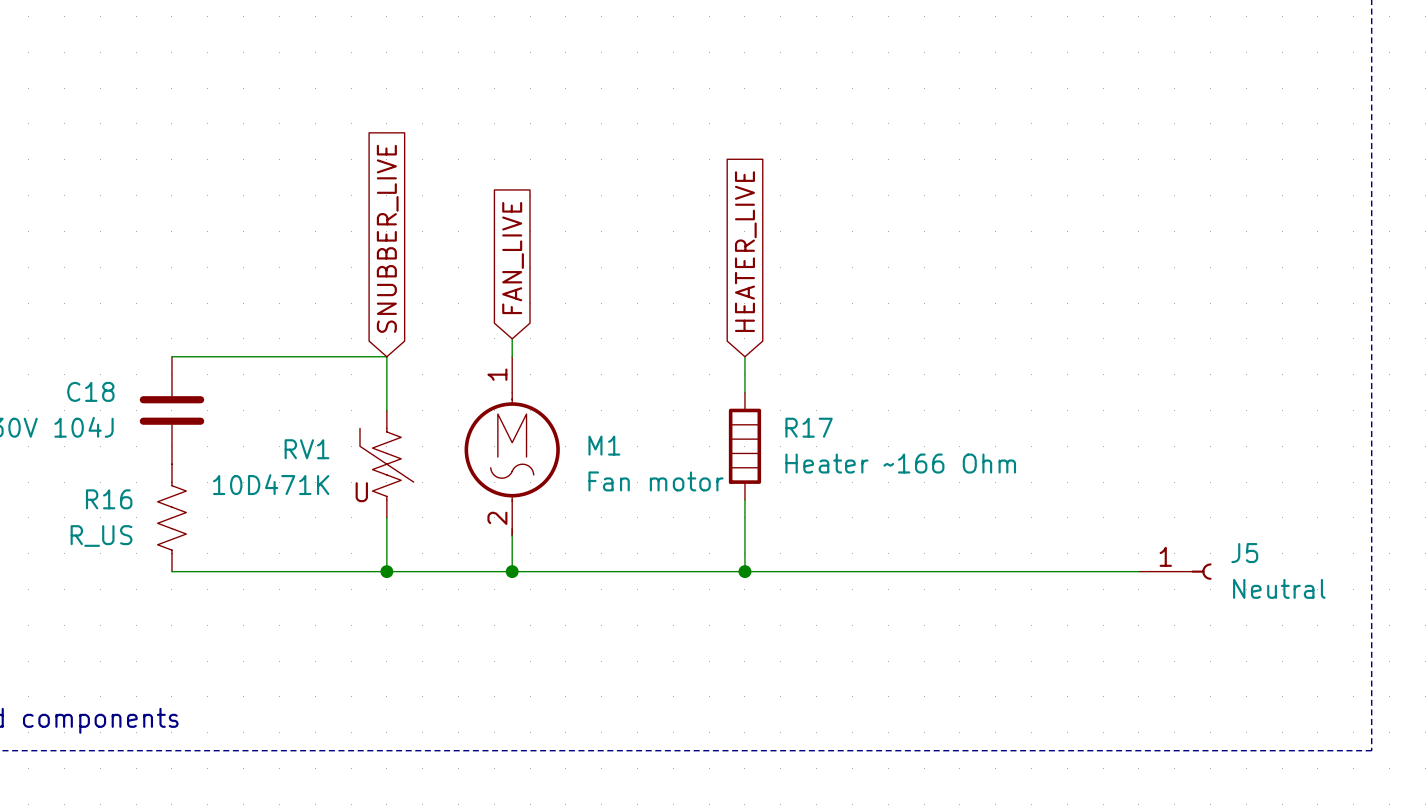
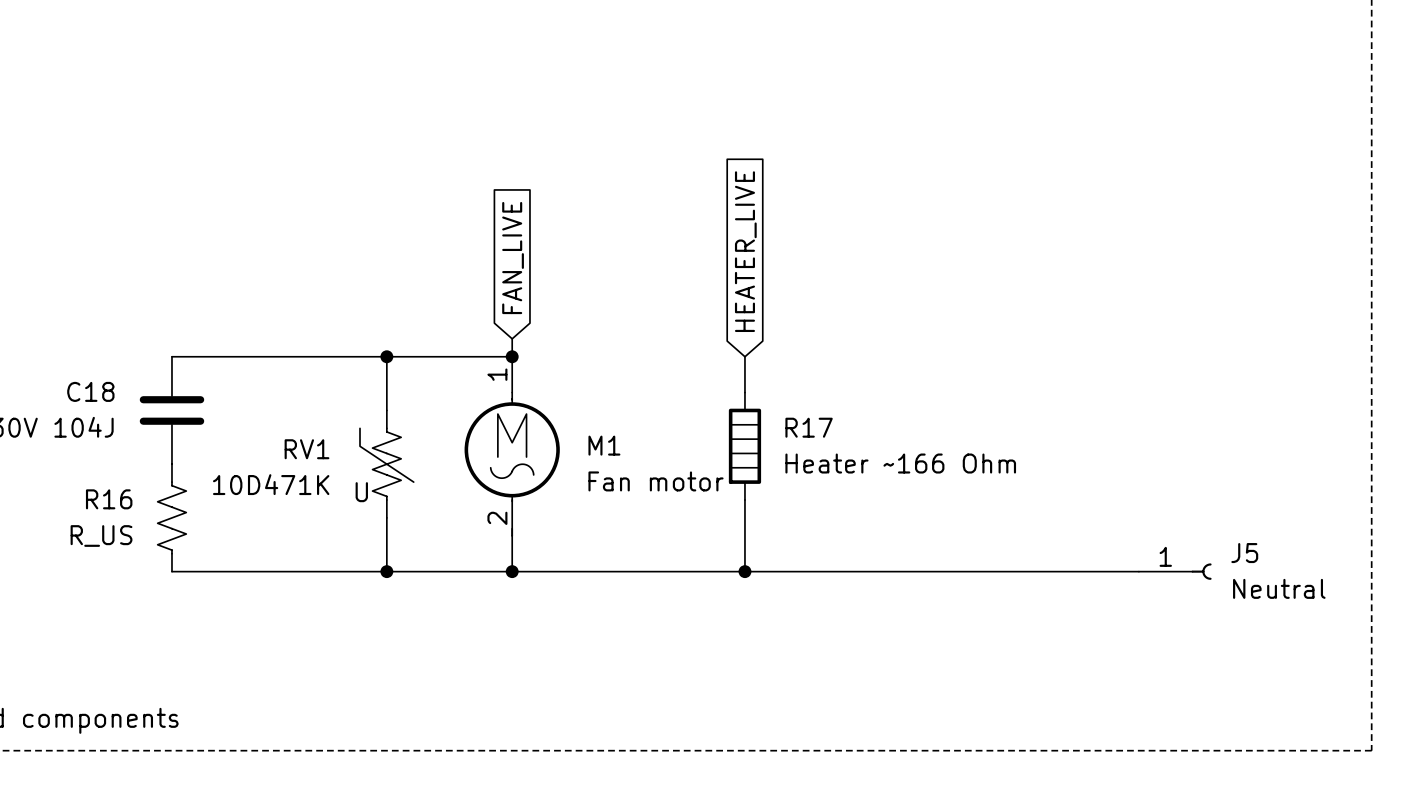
global label: SNUBBER_LIVE (387, 238) -> none
wire: none -> (386, 356) (512, 356)
junction: none -> (386, 356)
junction: none -> (512, 356)

